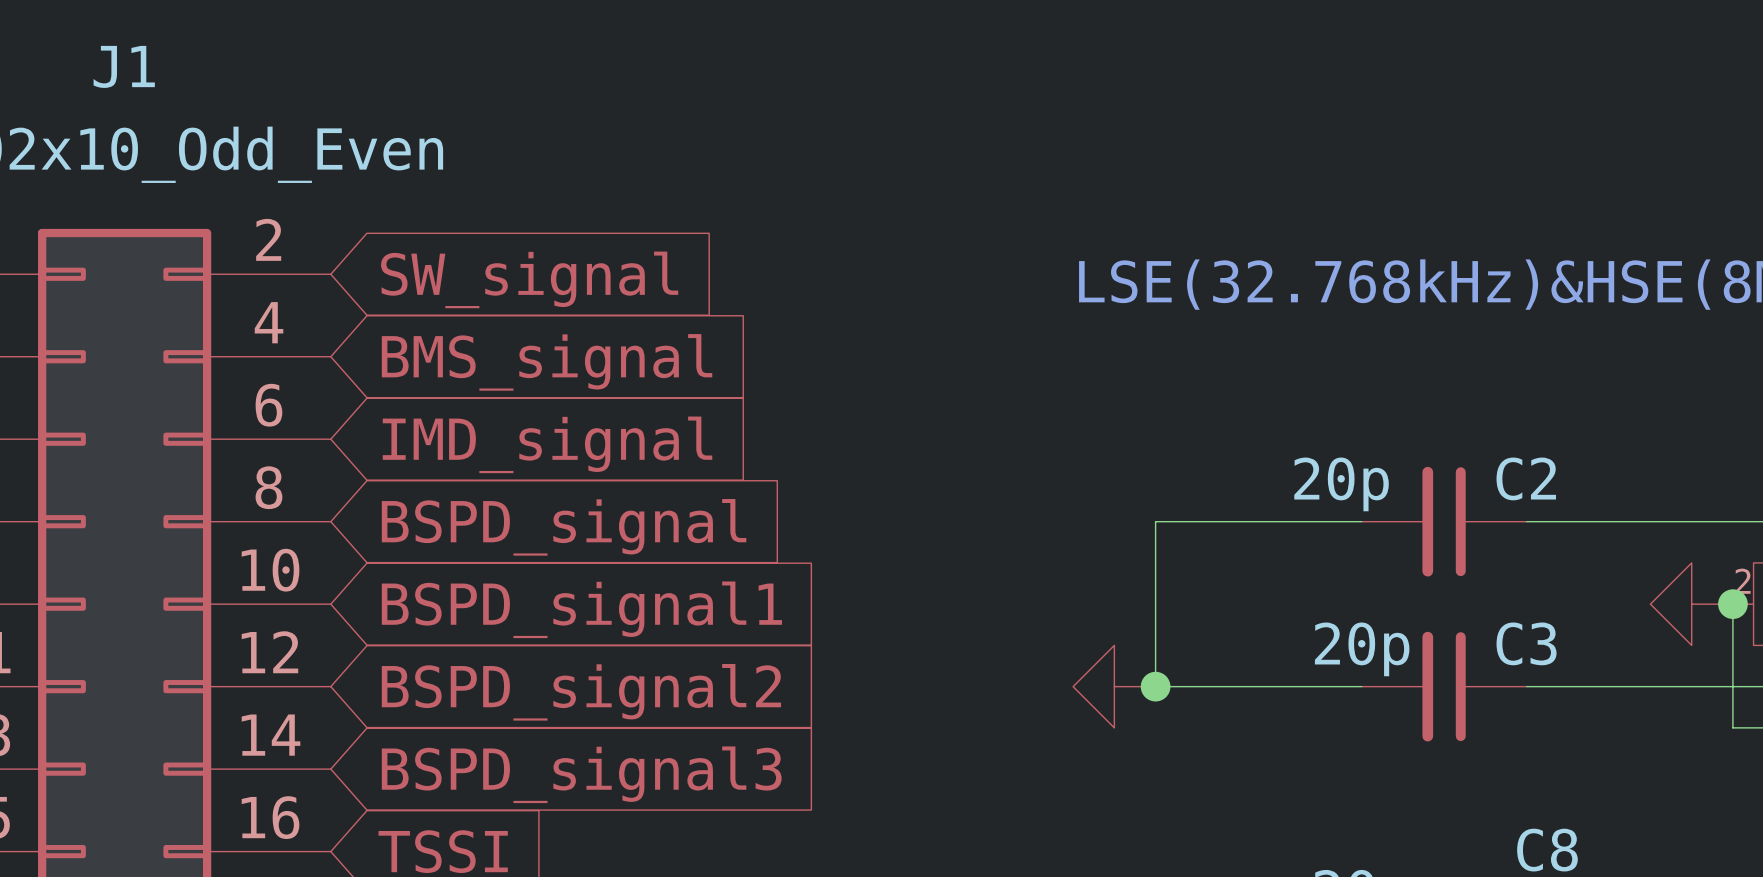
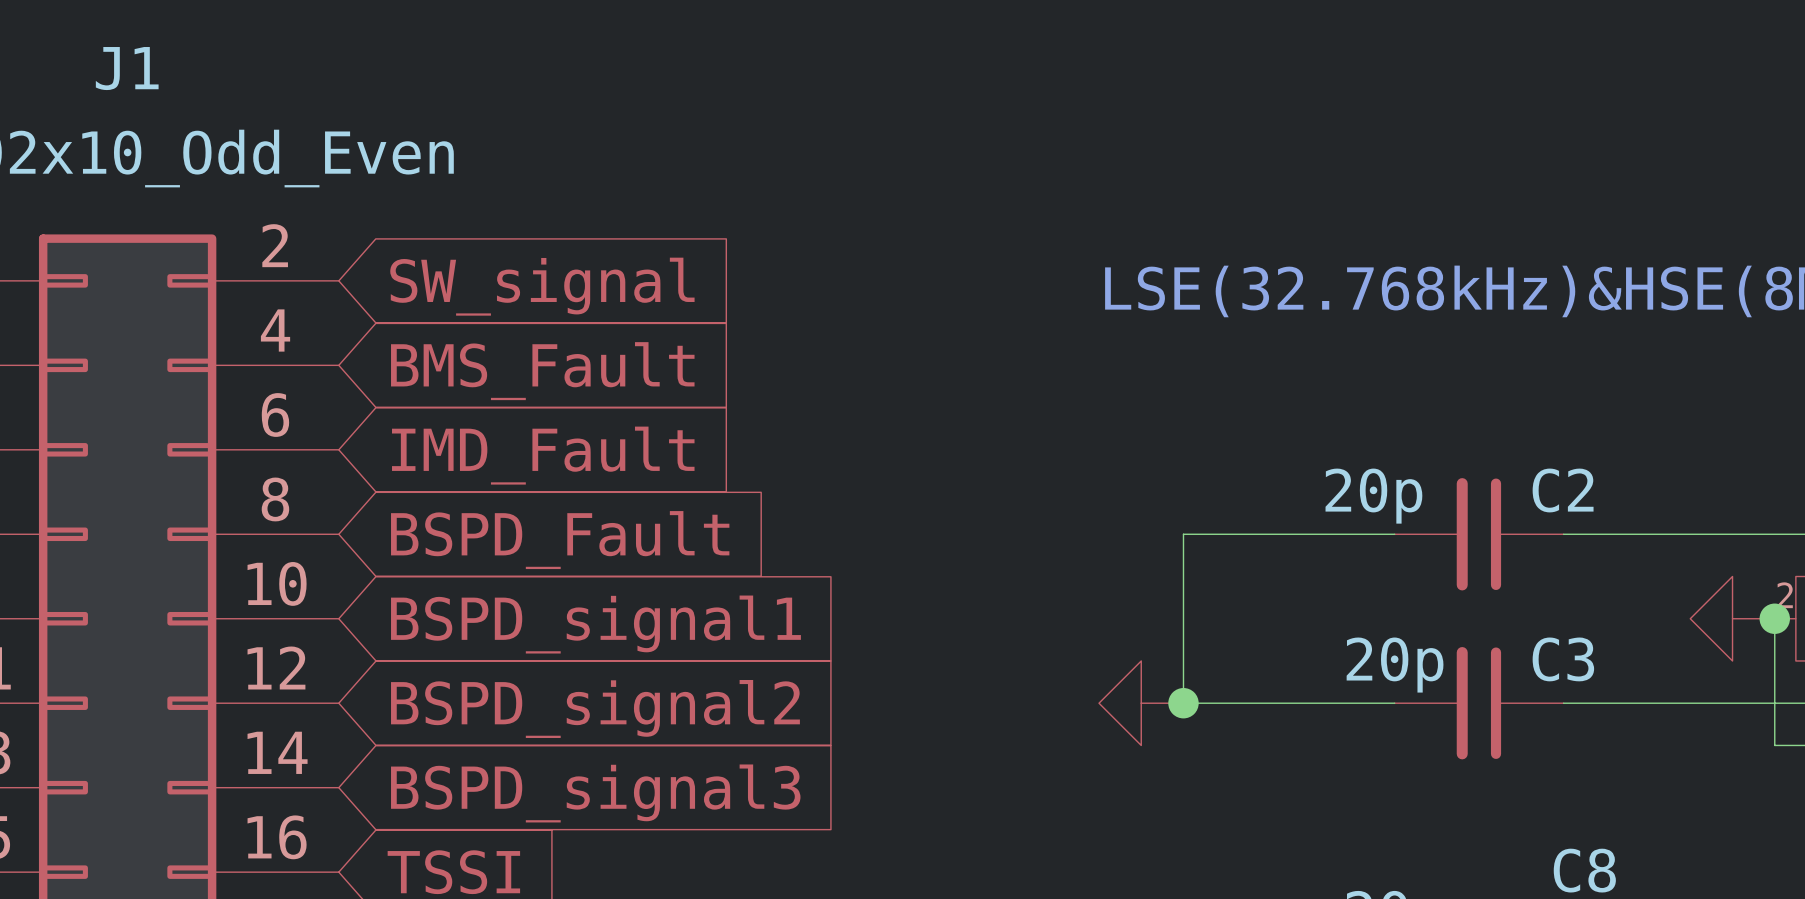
global label: BMS_signal (547, 362) -> BMS_Fault (542, 371)
global label: IMD_signal (547, 444) -> IMD_Fault (543, 455)
global label: BSPD_signal (564, 527) -> BSPD_Fault (560, 540)

